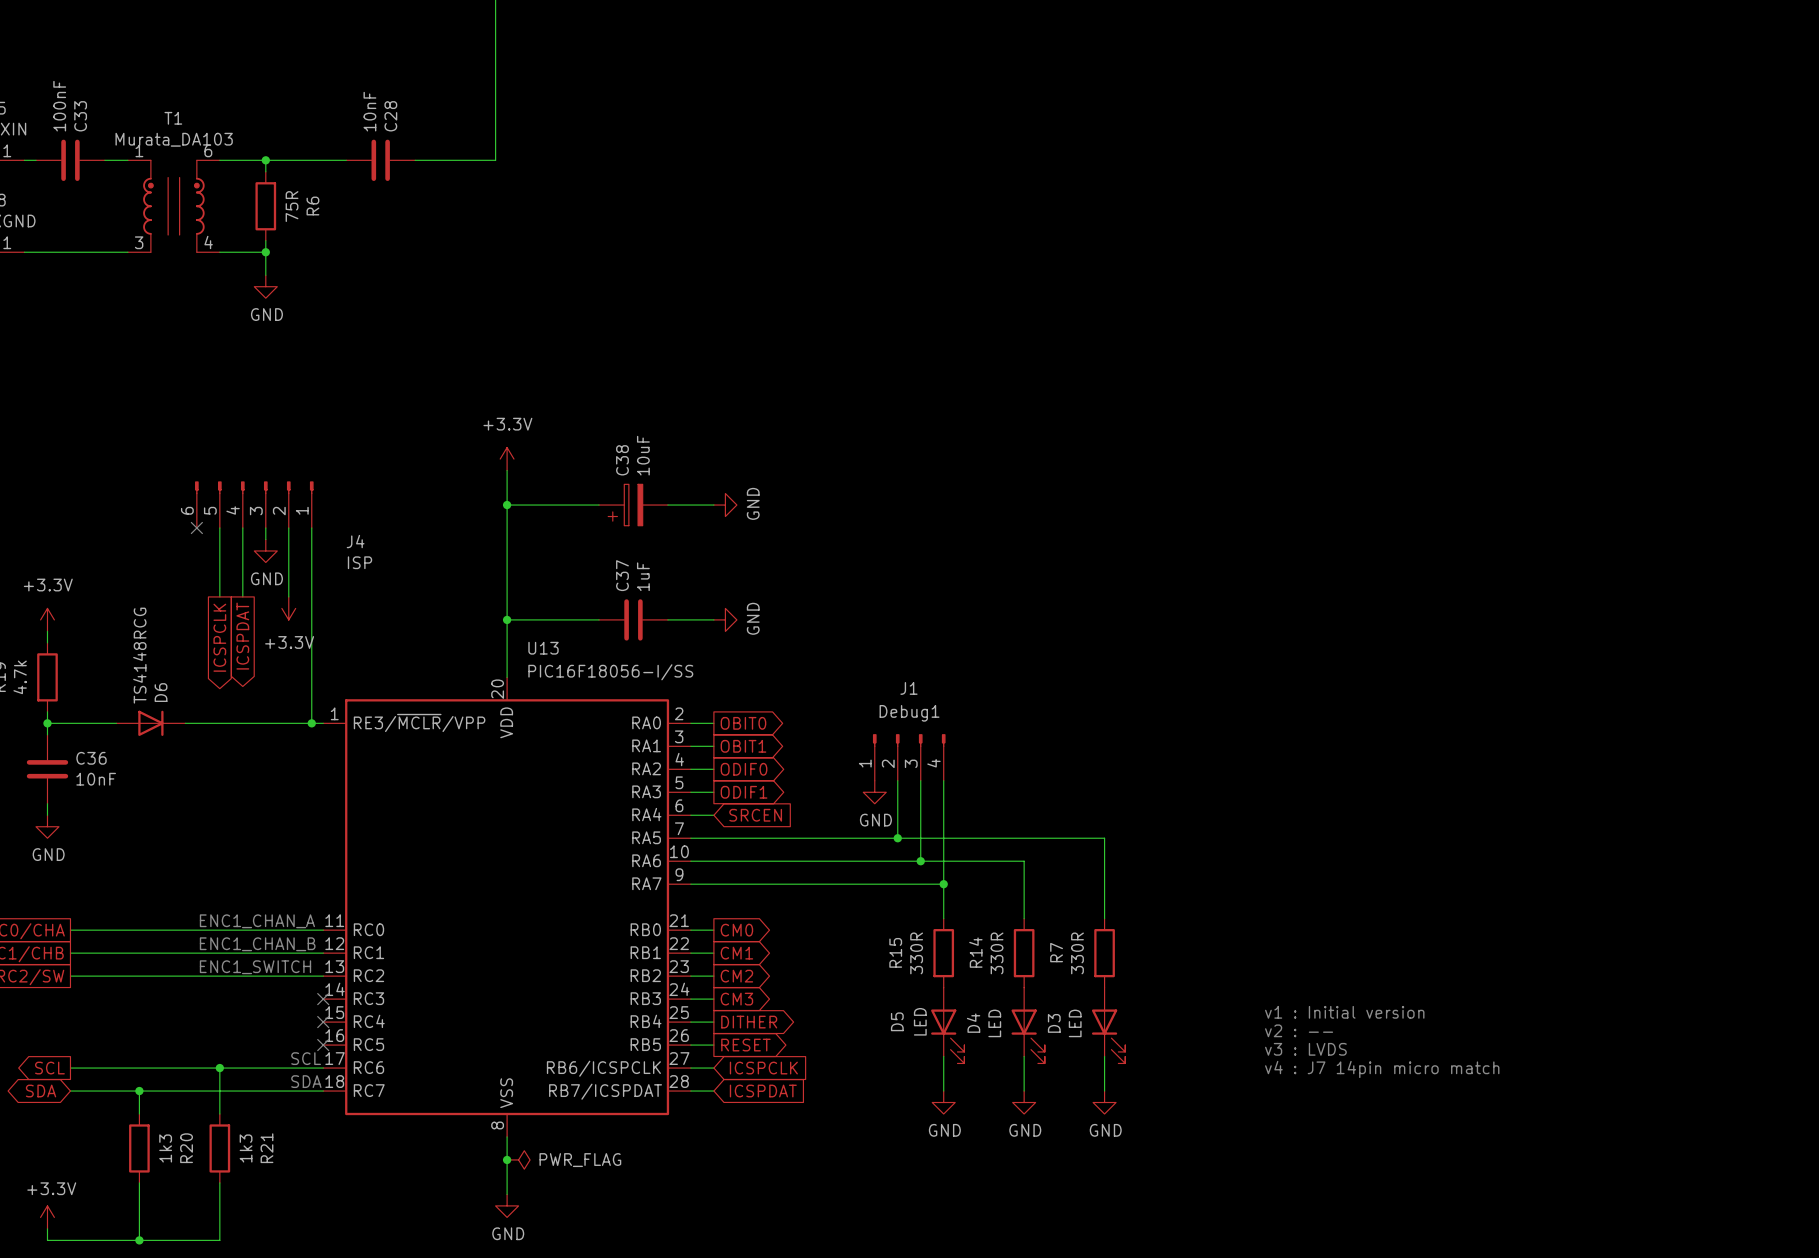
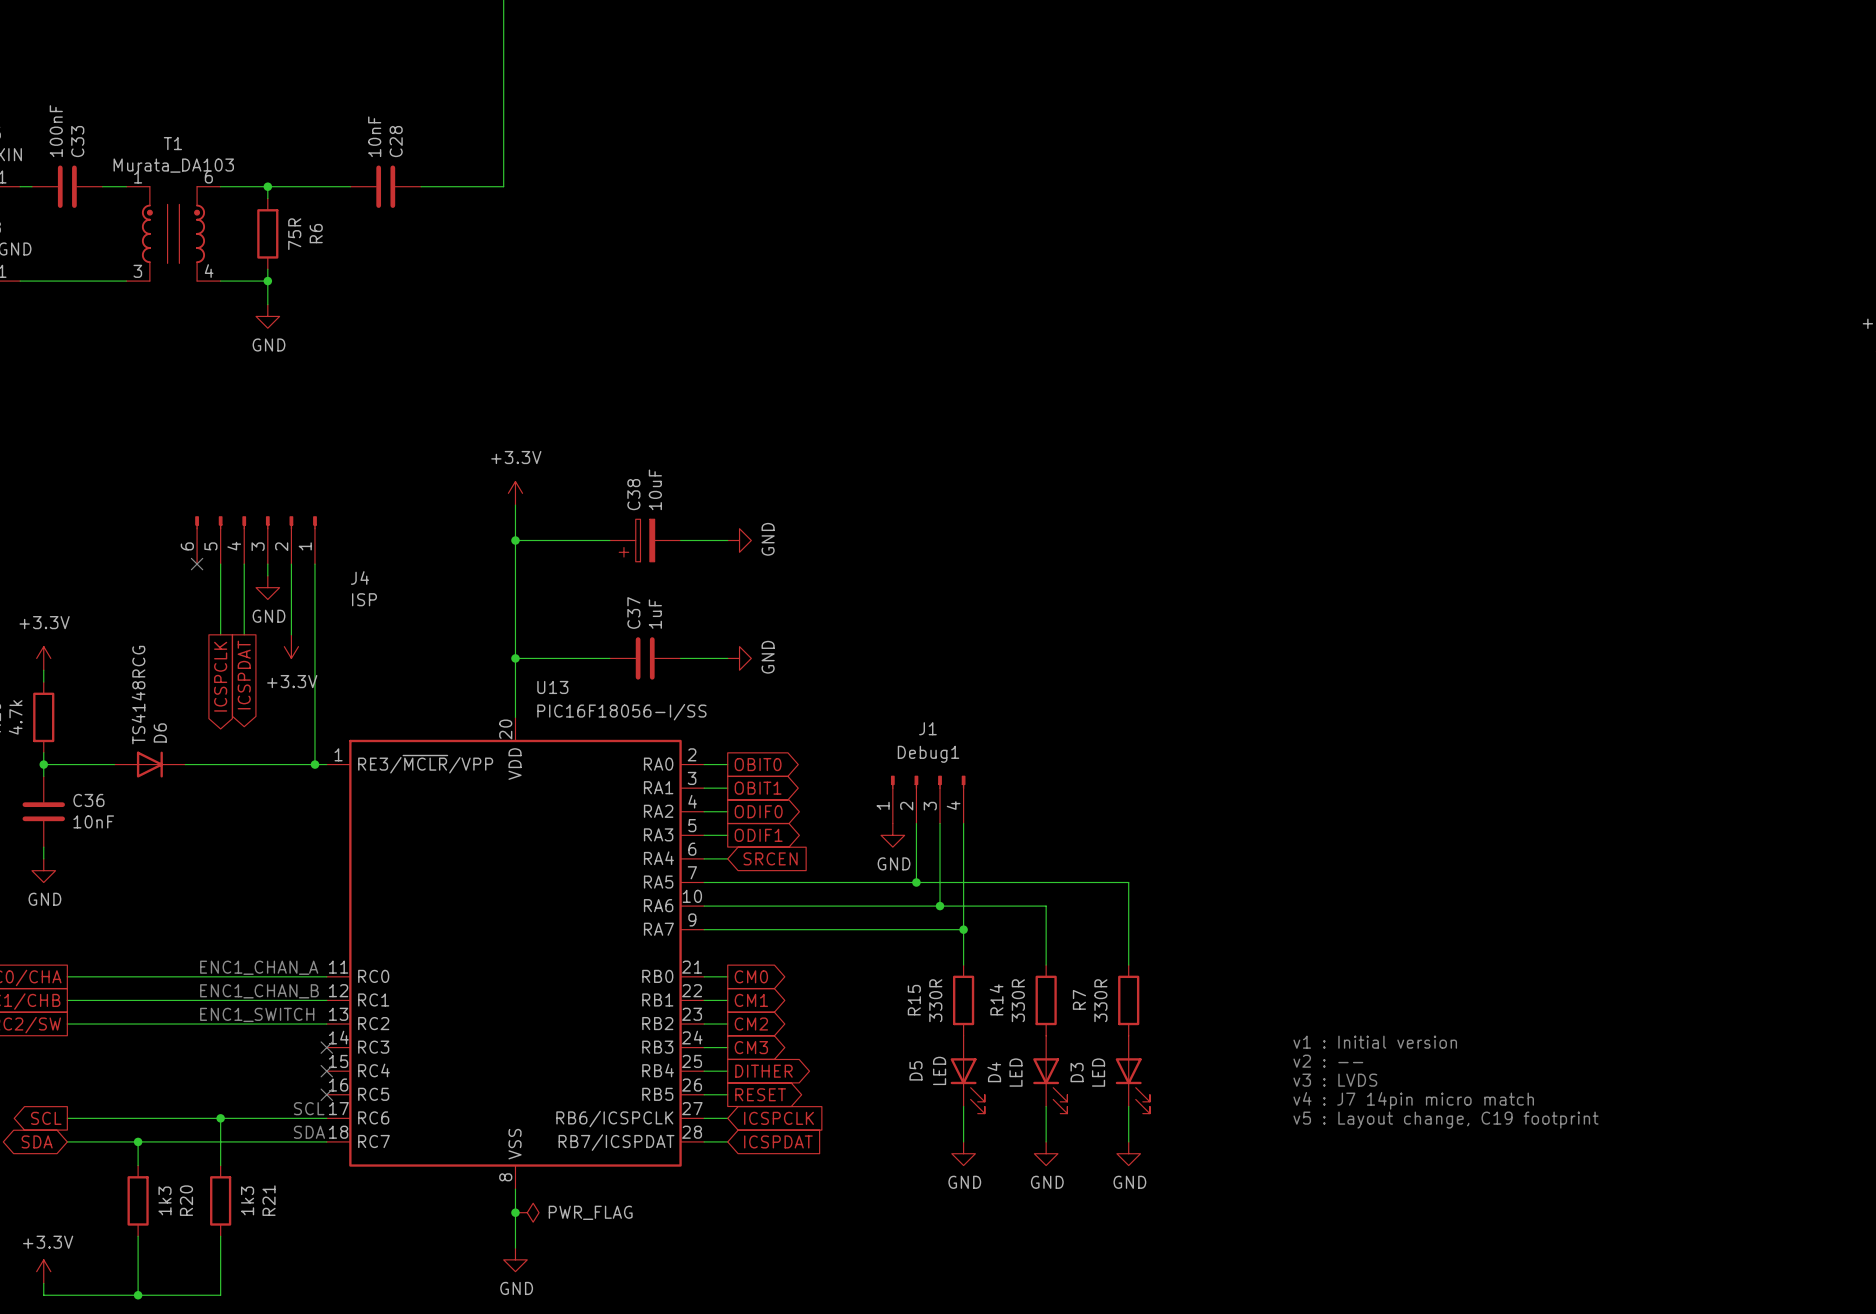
text: none -> v1 : Initial version (1375, 1042)
text: v1 : Initial version (1344, 1012) -> v2 : -- (1328, 1061)
text: v2 : -- (1299, 1030) -> v3 : LVDS (1335, 1080)
text: v3 : LVDS (1305, 1049) -> v4 : J7 14pin micro match (1413, 1100)
text: v4 : J7 14pin micro match (1382, 1069) -> v5 : Layout change, C19 footprint (1445, 1120)

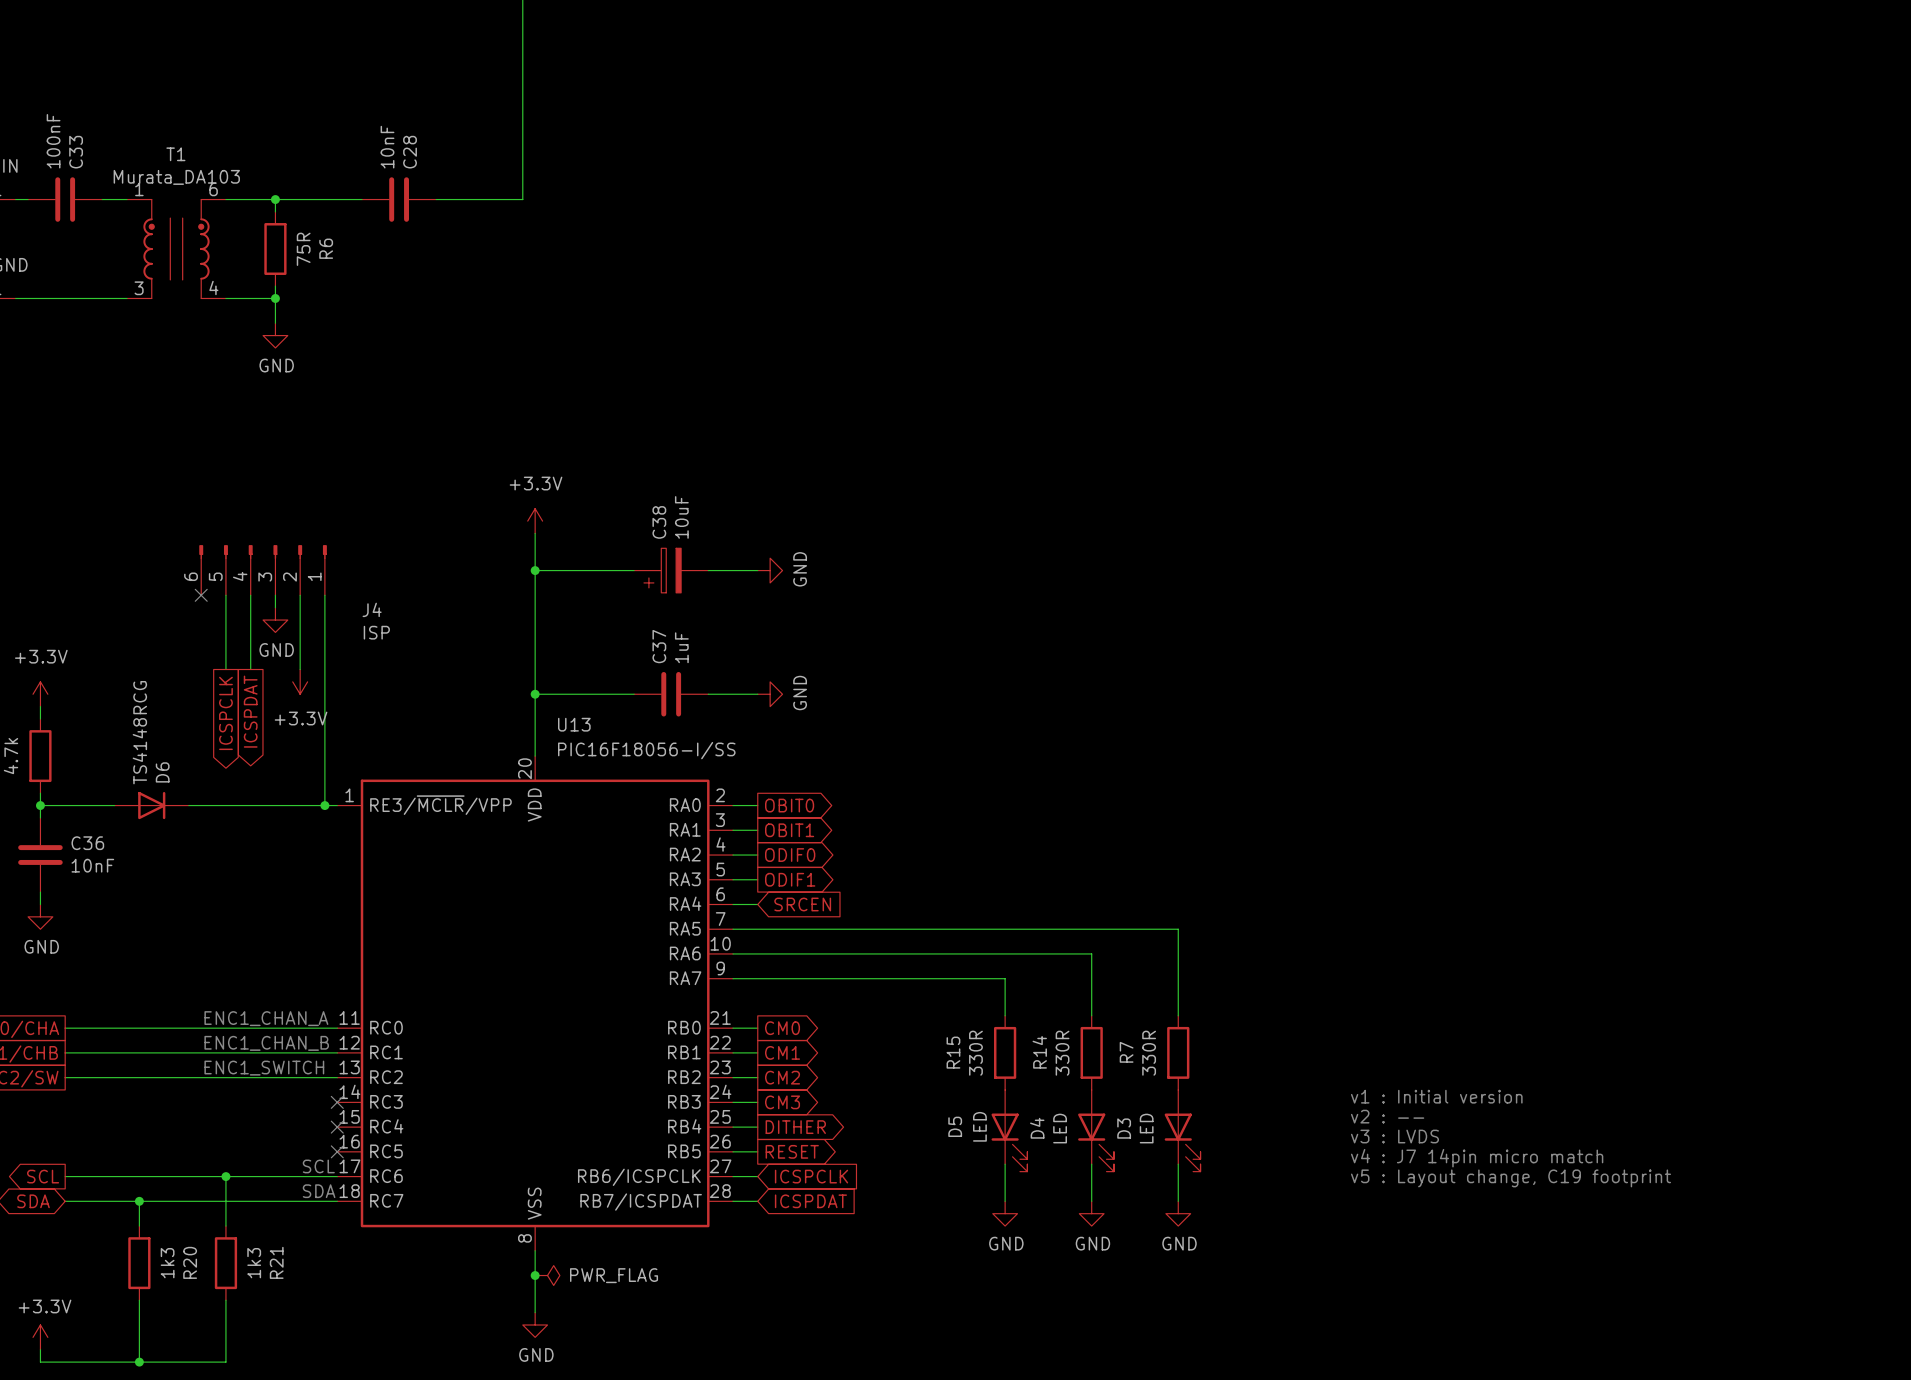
J1: Debug1 (928, 799) -> none
wire: (916, 823) (916, 882) -> none
wire: (940, 823) (940, 906) -> none
wire: (963, 823) (963, 929) -> none
power symbol: GND (892, 835) -> none
junction: (916, 882) -> none
junction: (940, 906) -> none
junction: (963, 929) -> none

